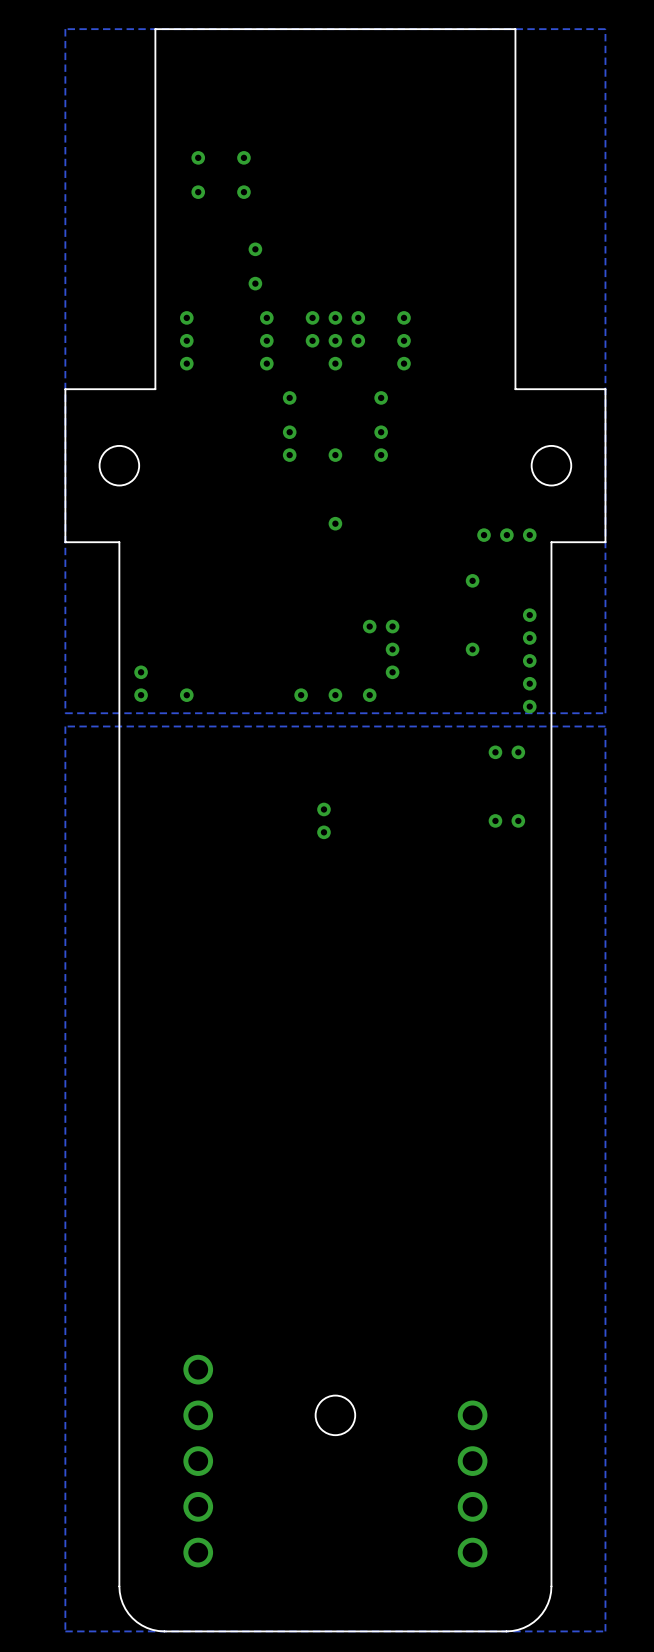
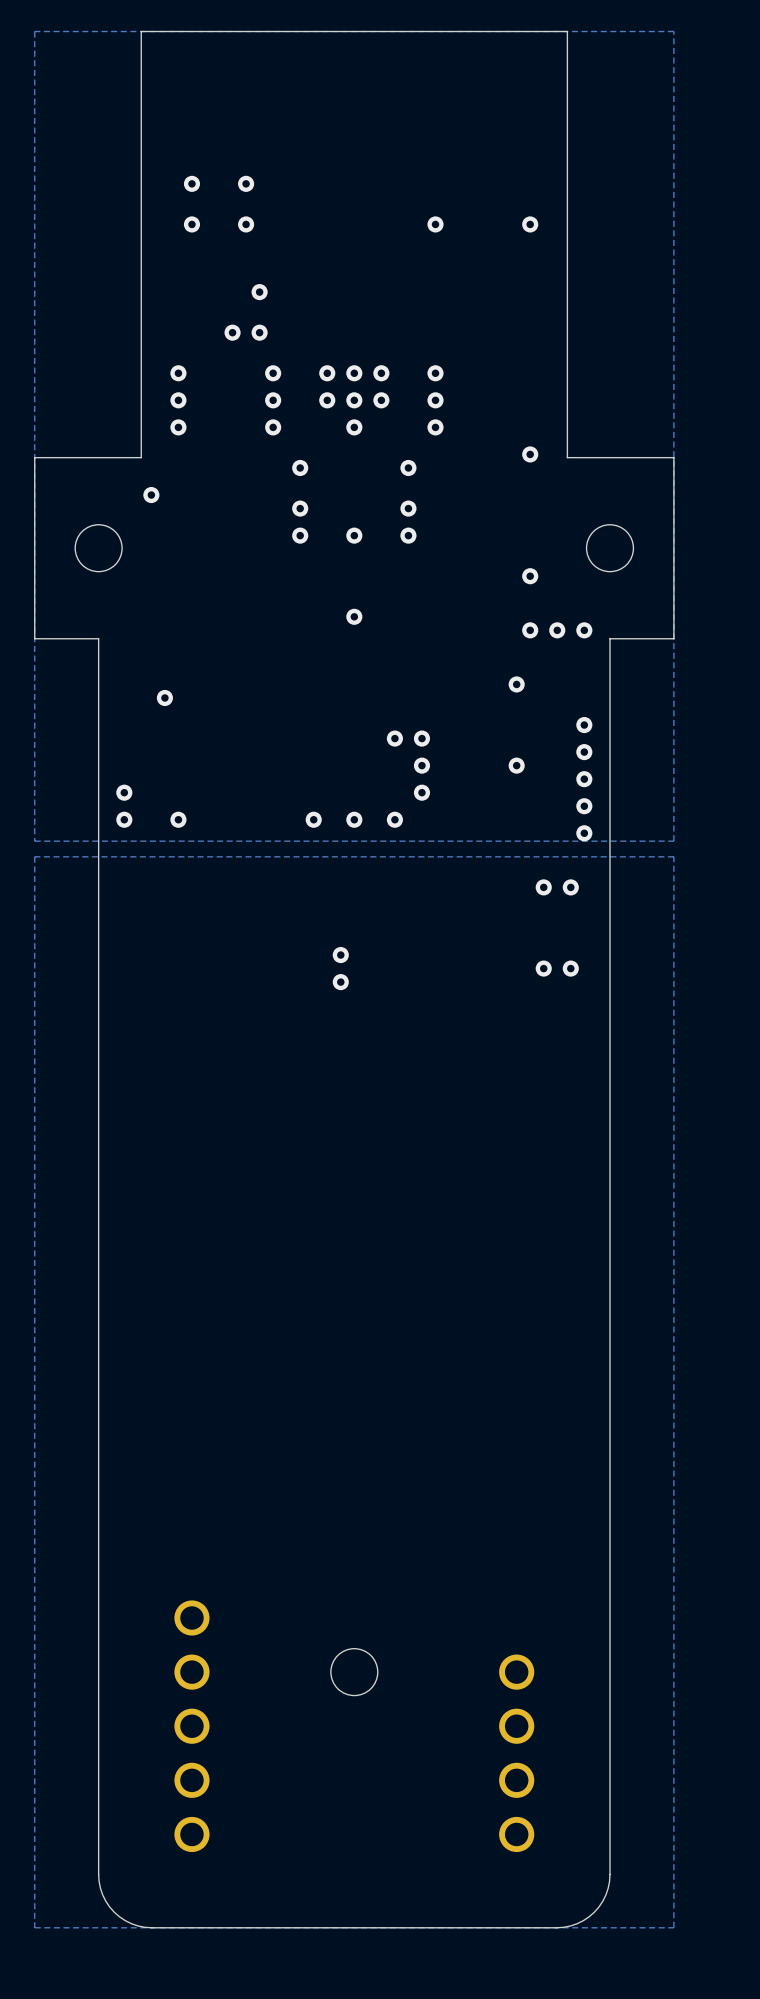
via: none -> (435, 224)
via: none -> (530, 224)
via: none -> (232, 332)
via: none -> (530, 454)
via: none -> (151, 495)
via: none -> (530, 576)
via: none -> (164, 697)

